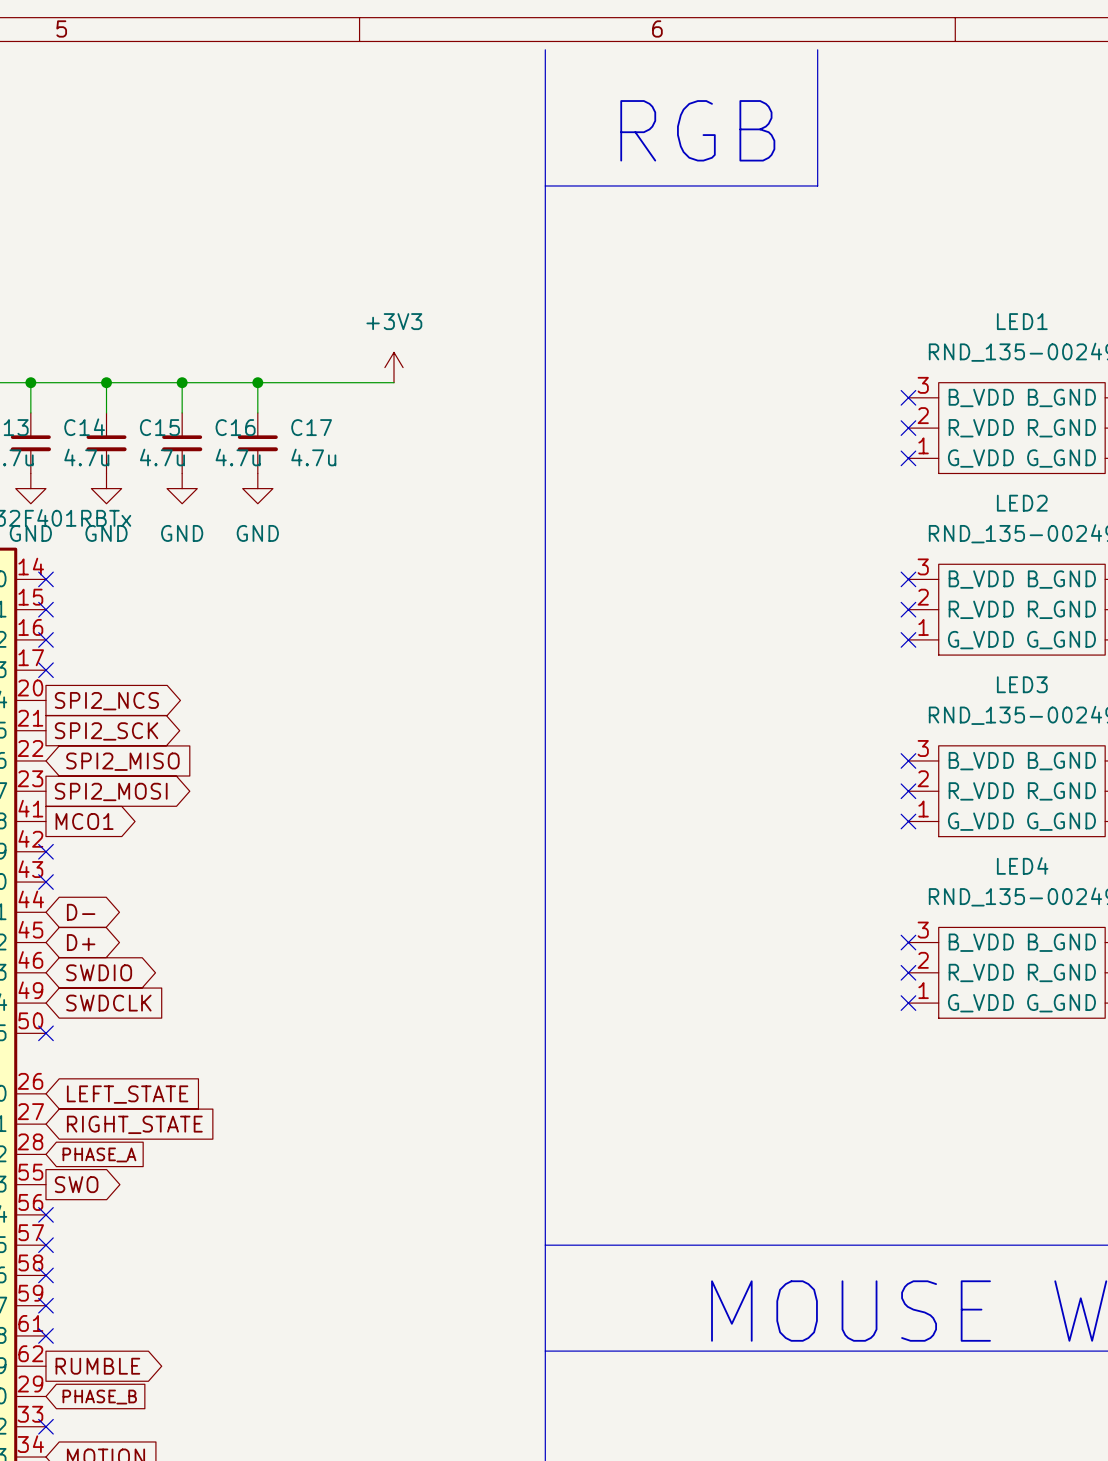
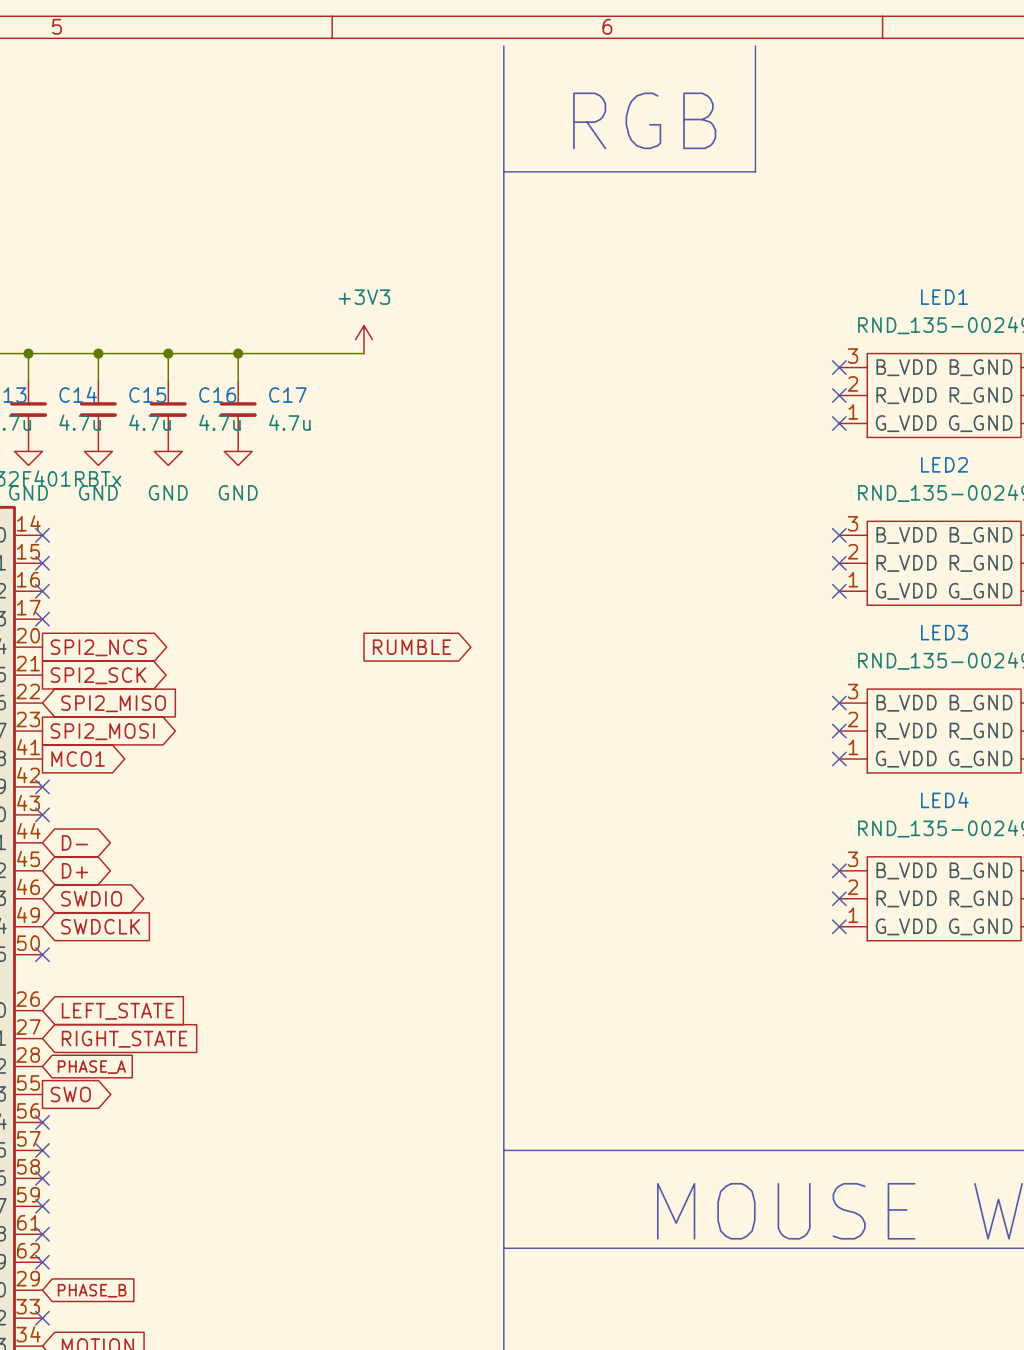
global label: none -> RUMBLE (411, 647)
no-connect mark: none -> (42, 1262)
global label: RUMBLE (97, 1366) -> none

